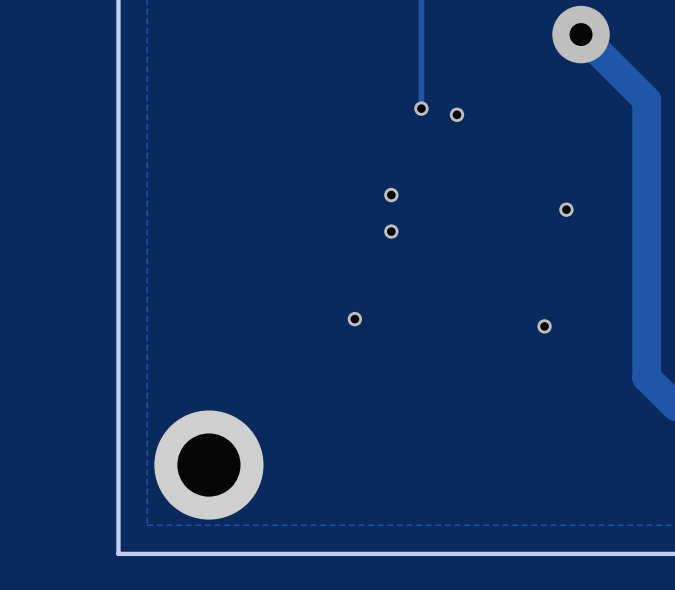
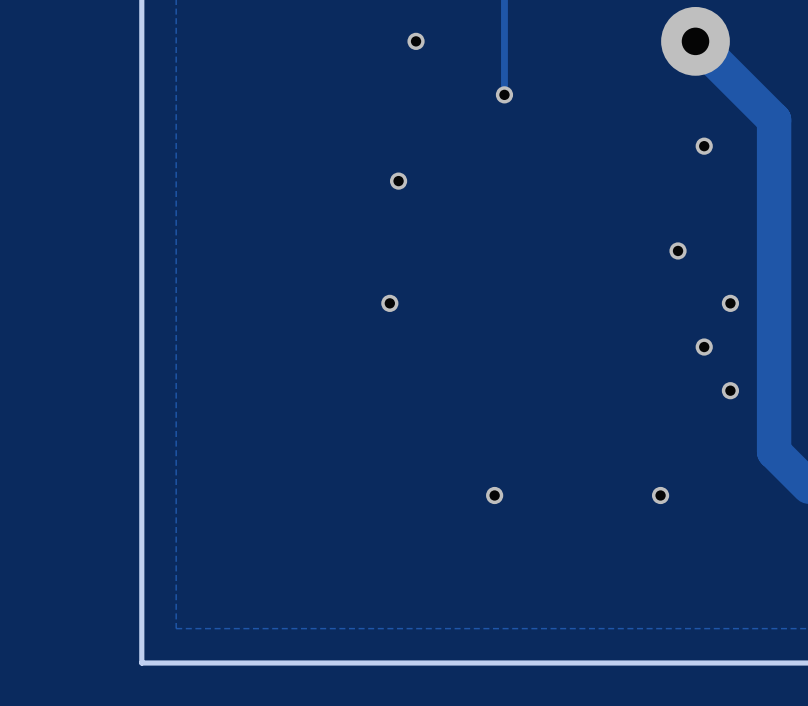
via: none -> (416, 41)
track: (421, 79) (421, 108) -> none
via: none -> (504, 94)
via: (421, 108) -> none
via: (457, 114) -> none
via: none -> (704, 146)
via: none -> (398, 181)
via: (391, 195) -> none
via: (391, 231) -> none
via: none -> (389, 303)
via: none -> (730, 303)
via: none -> (704, 347)
via: (354, 319) -> none
via: (544, 326) -> none
via: none -> (730, 390)
via: none -> (494, 495)
via: none -> (660, 495)
part: (208, 465) -> none

